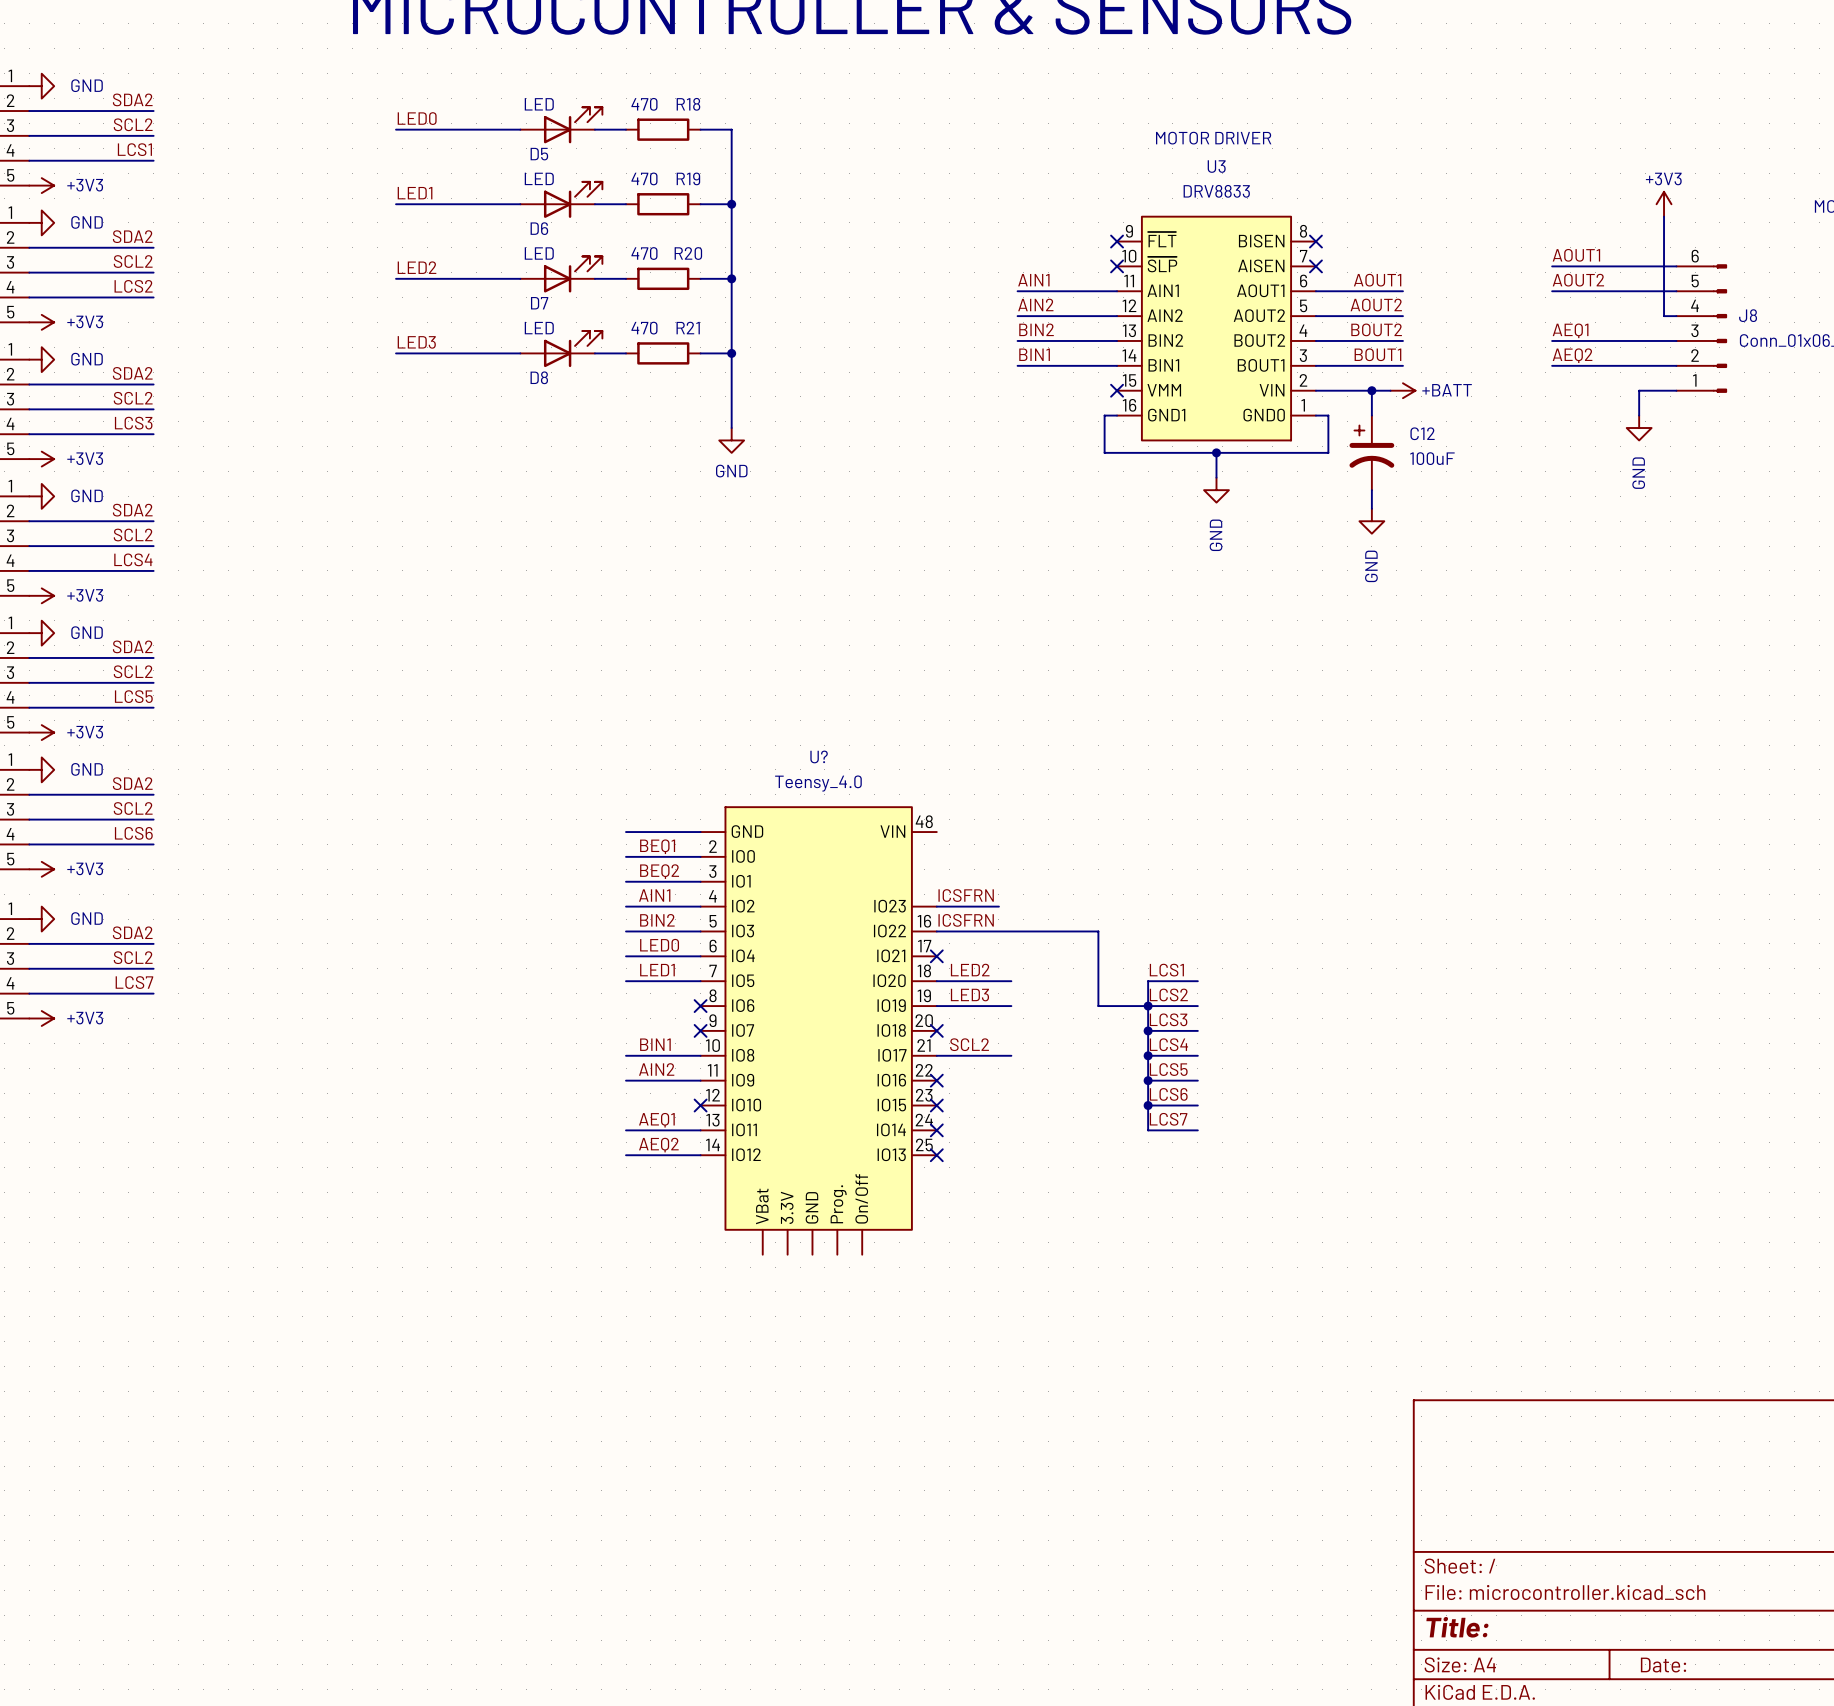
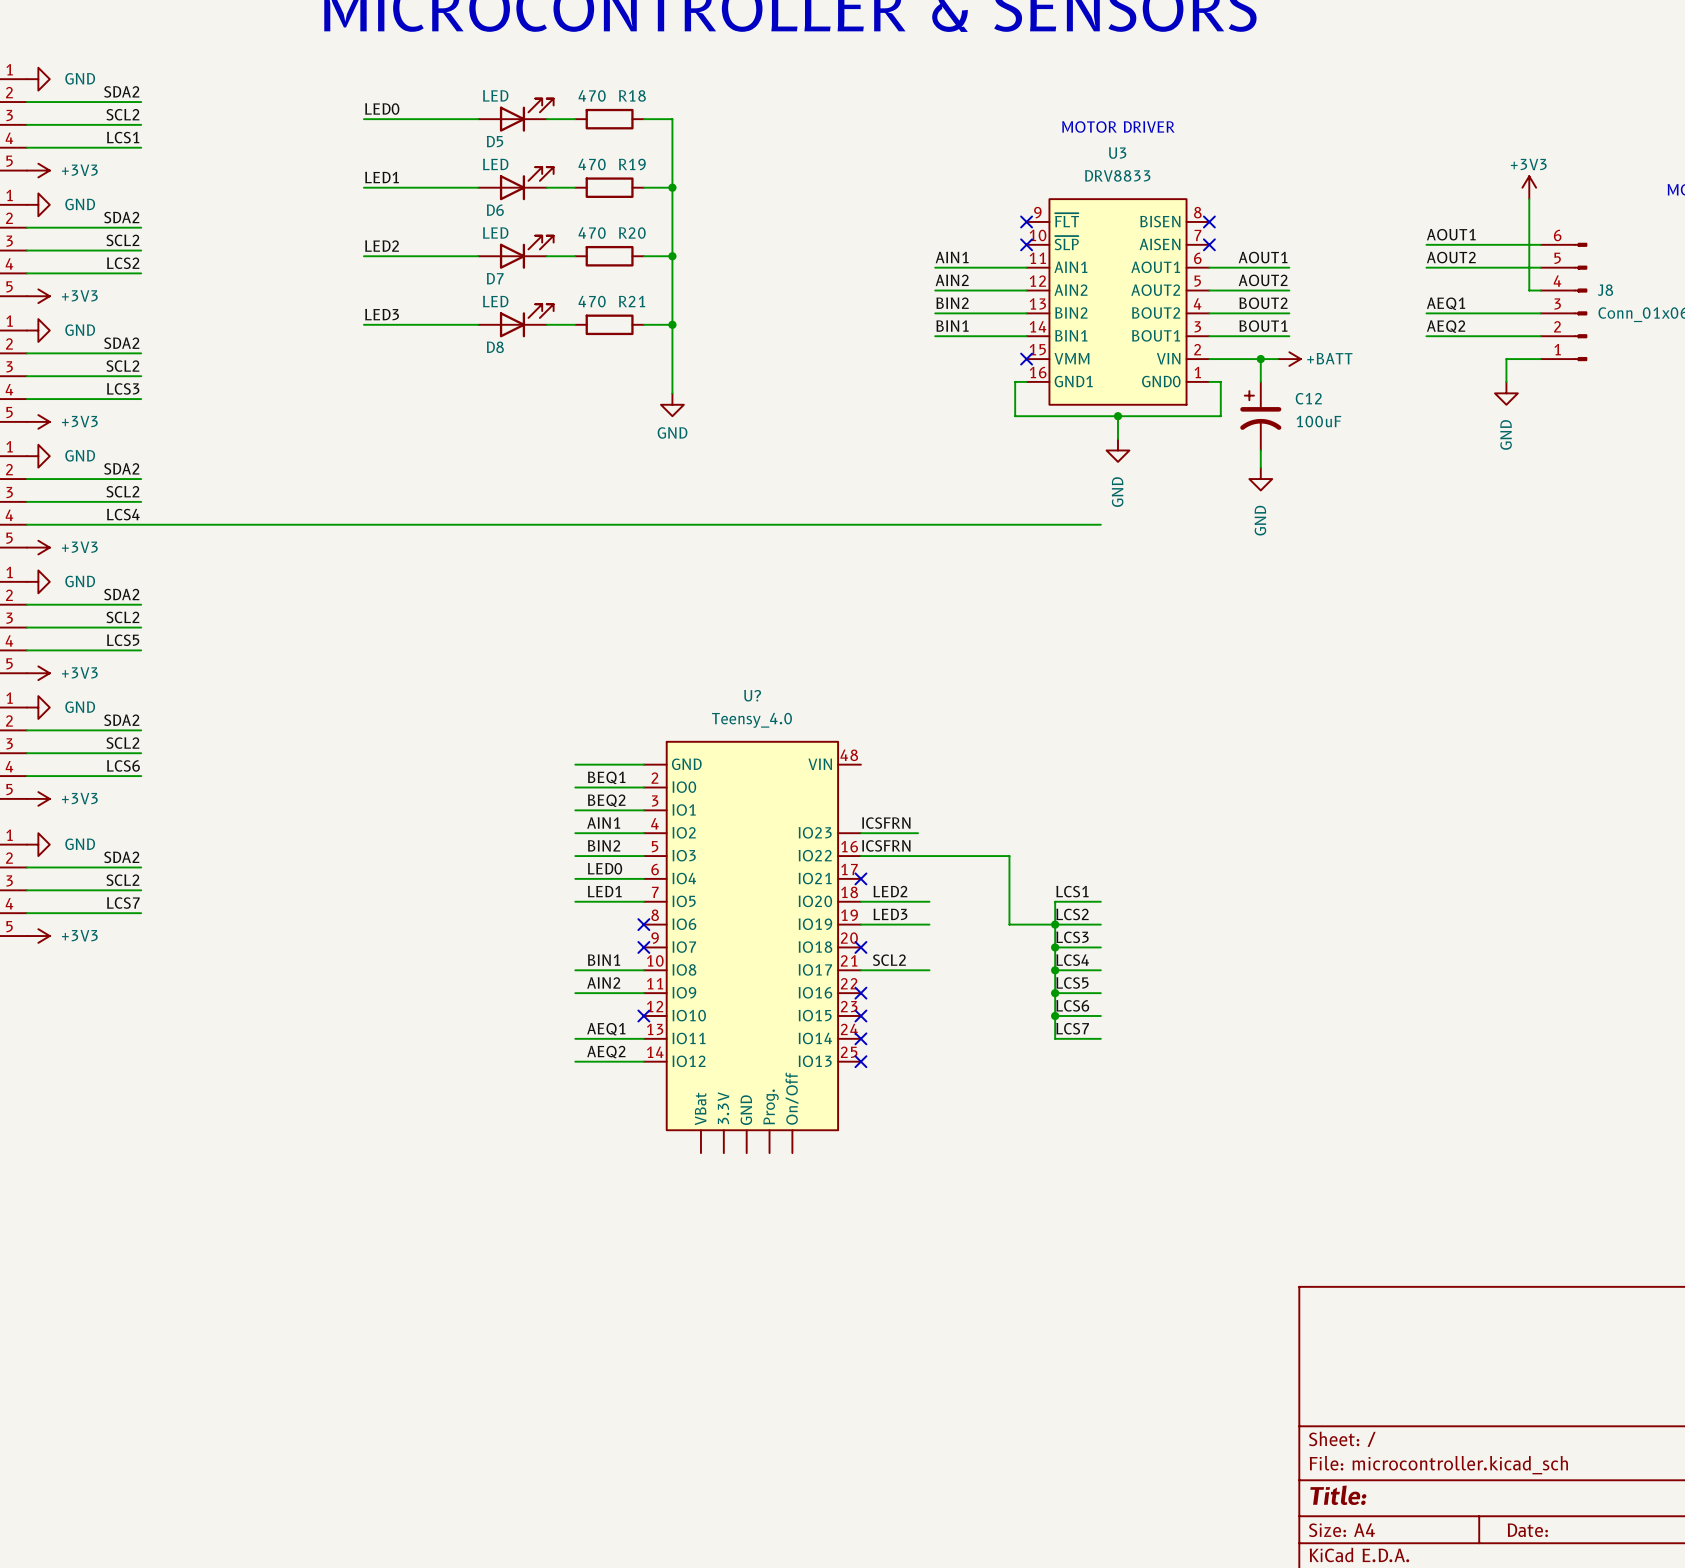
wire: none -> (141, 524) (1100, 524)

